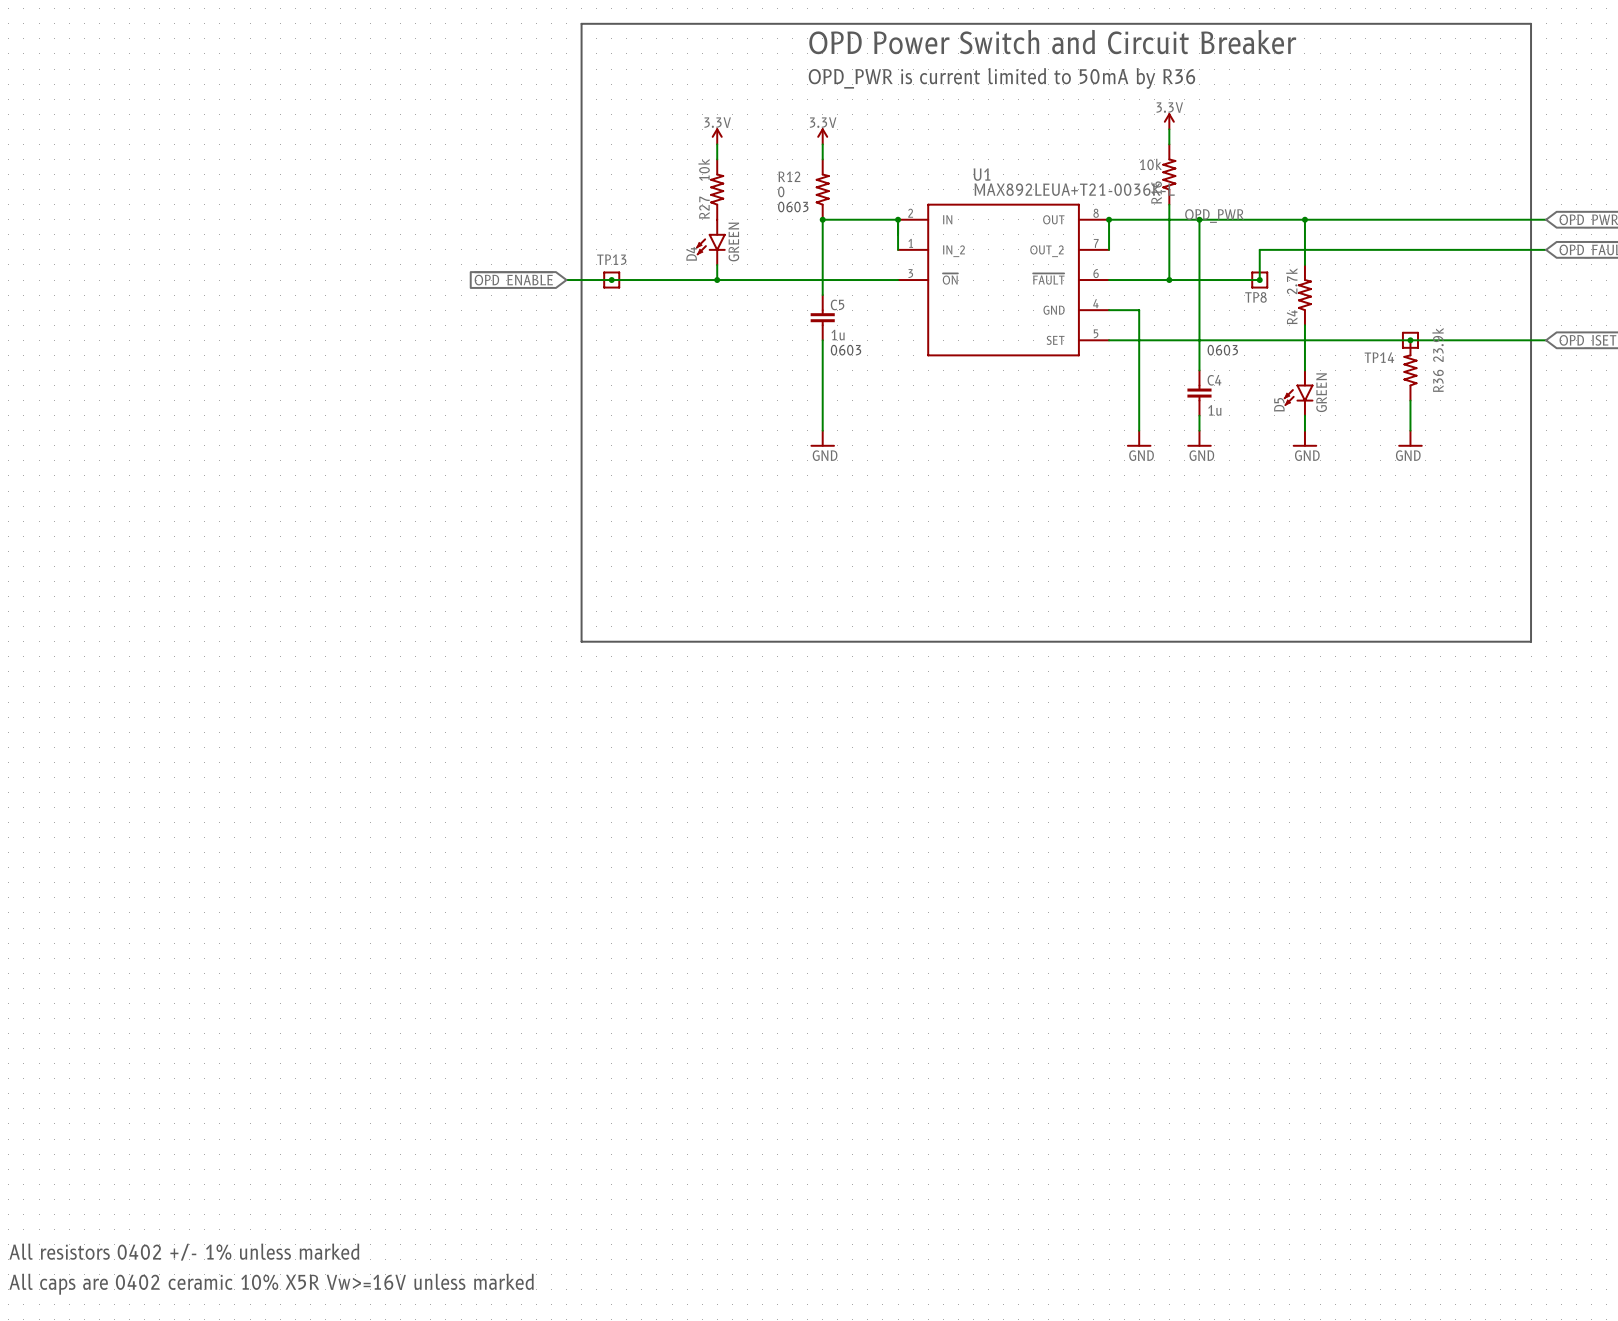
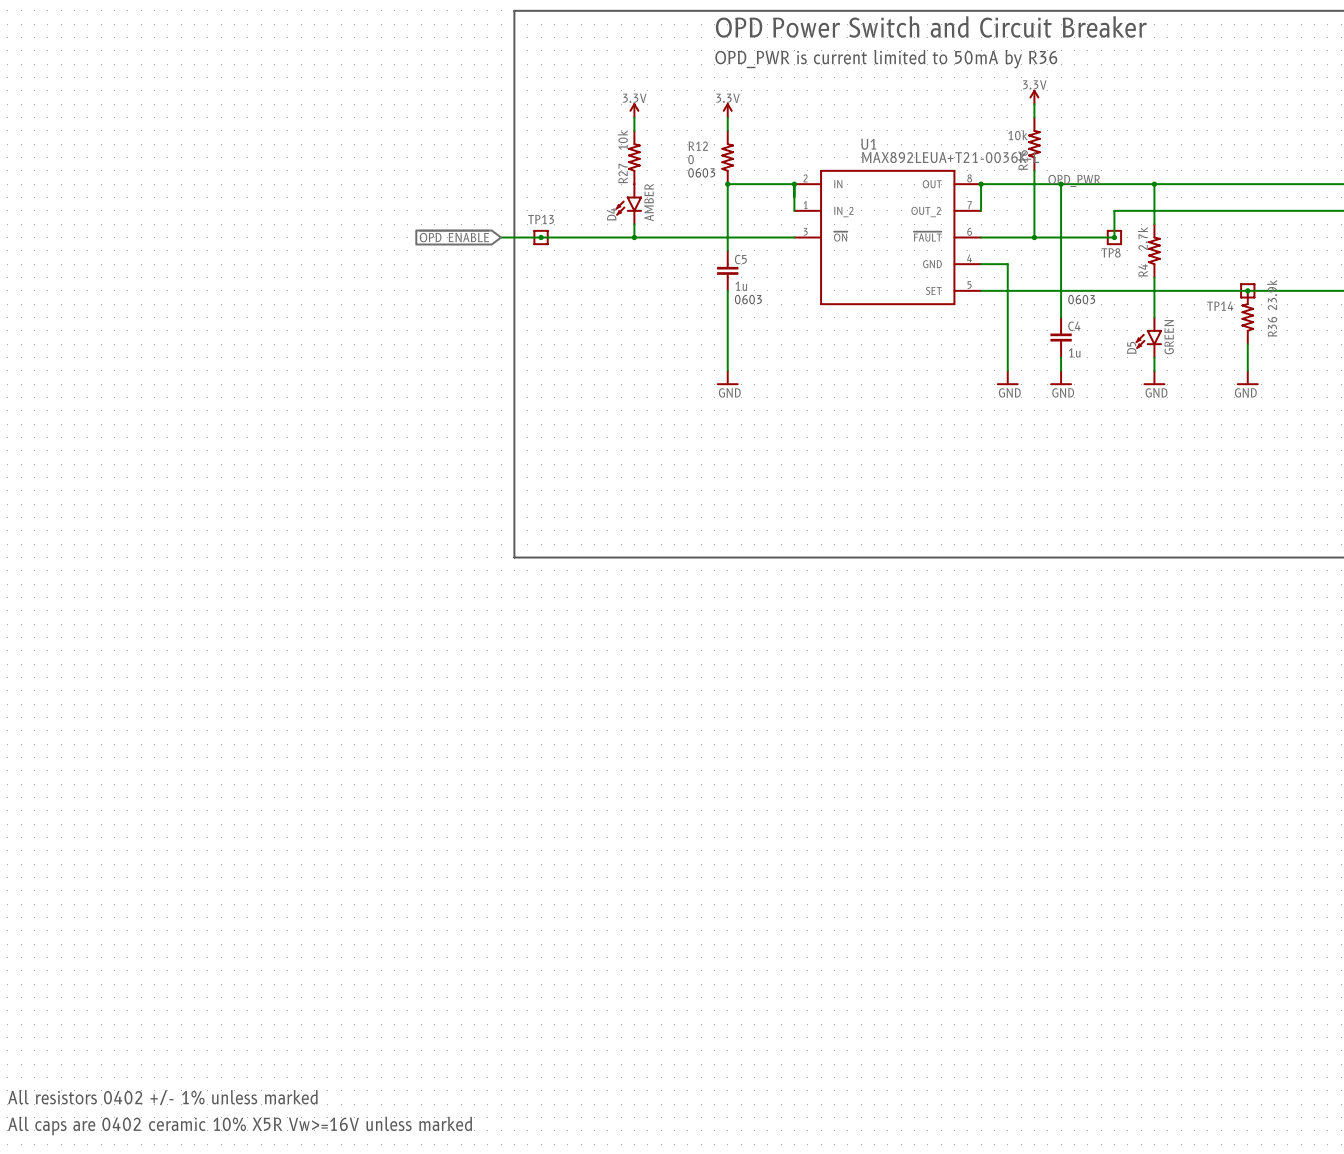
D4 value: GREEN (733, 242) -> AMBER (649, 202)

